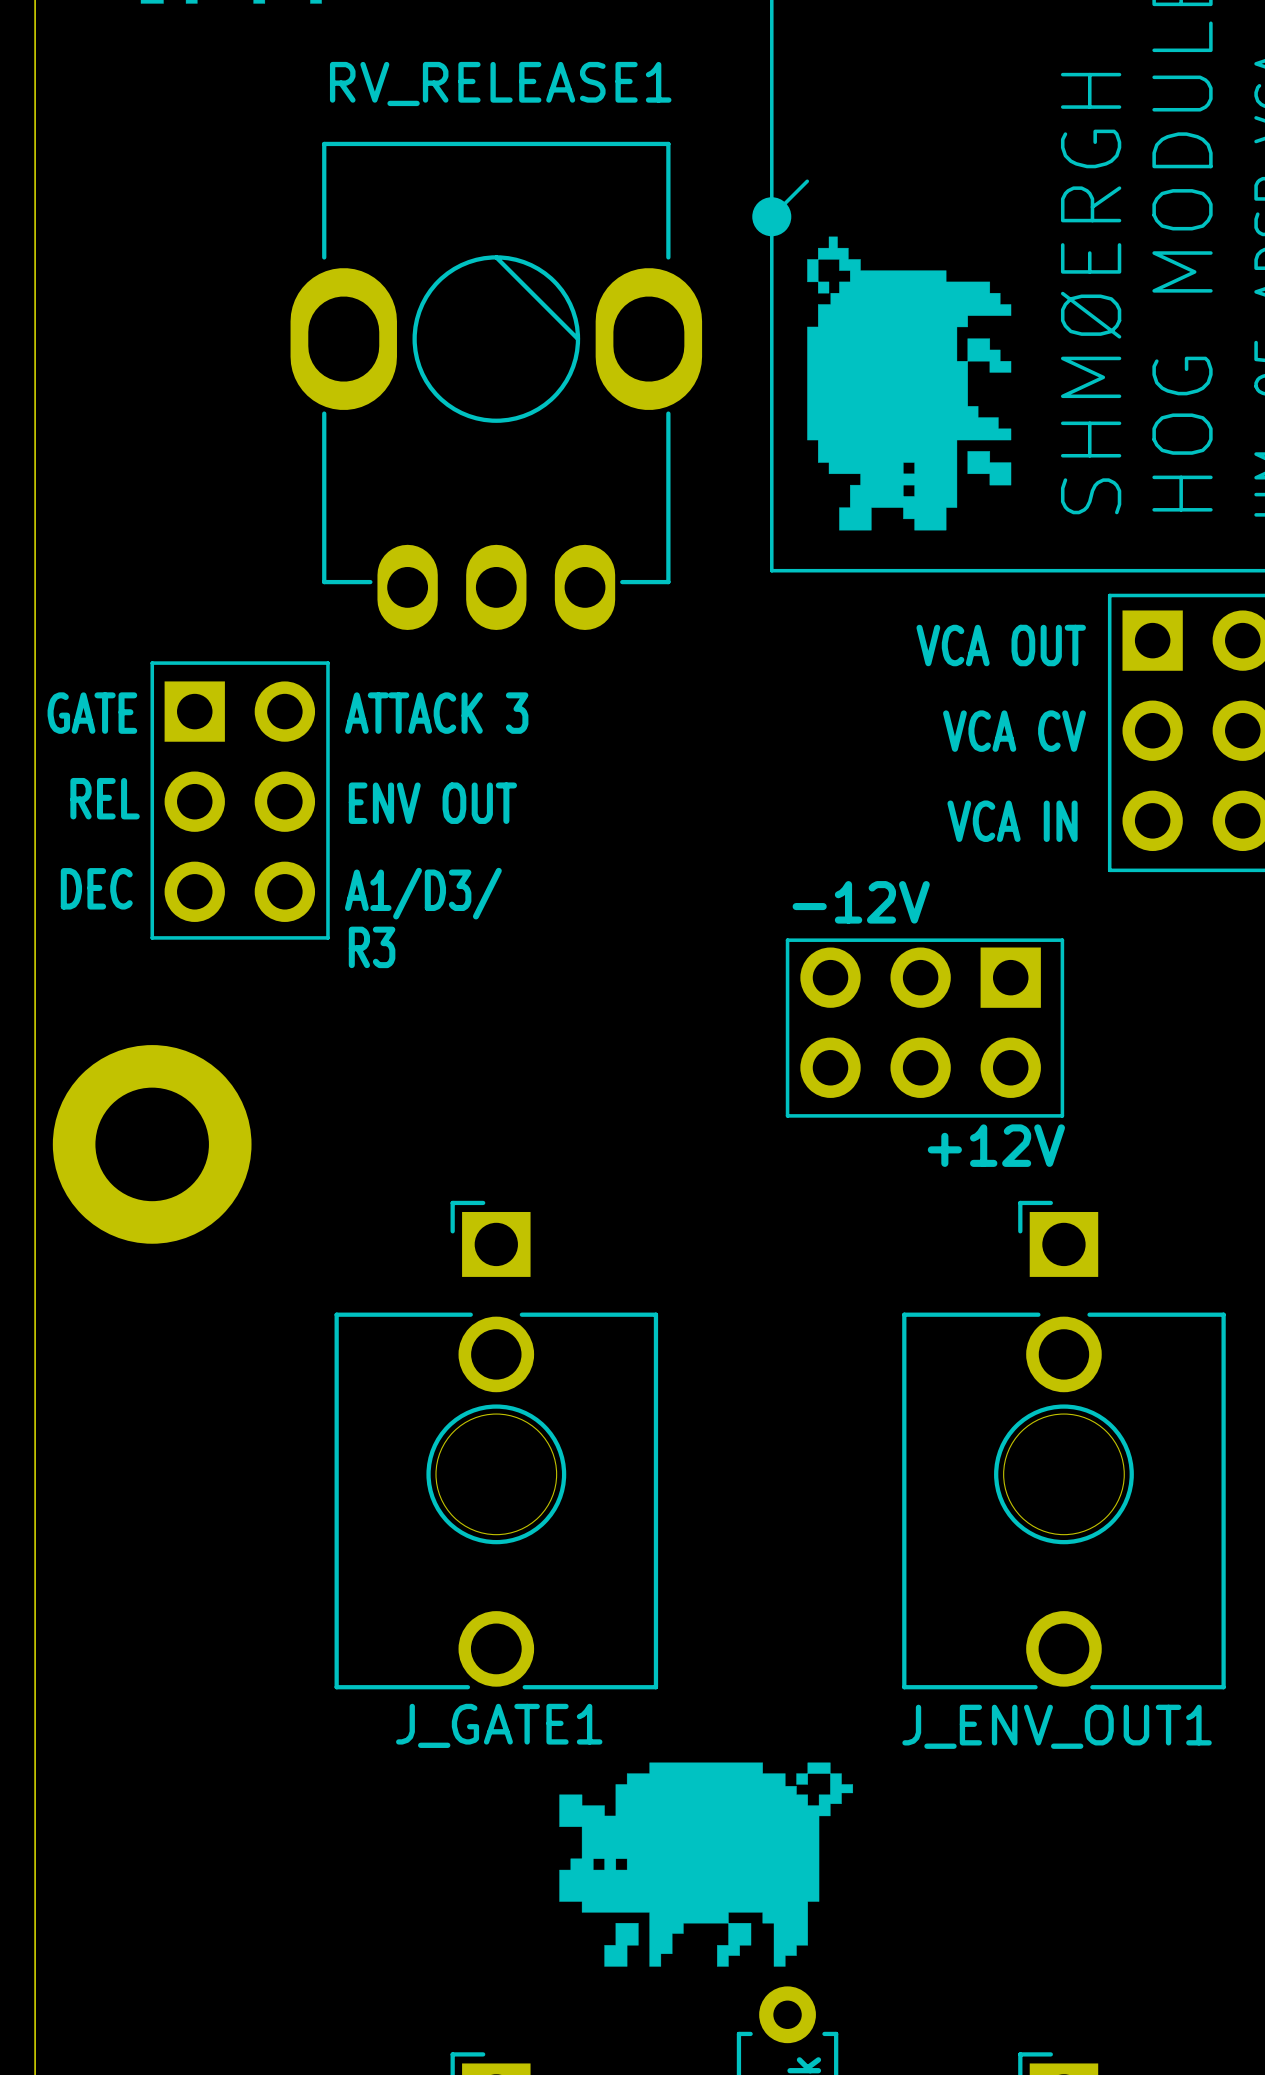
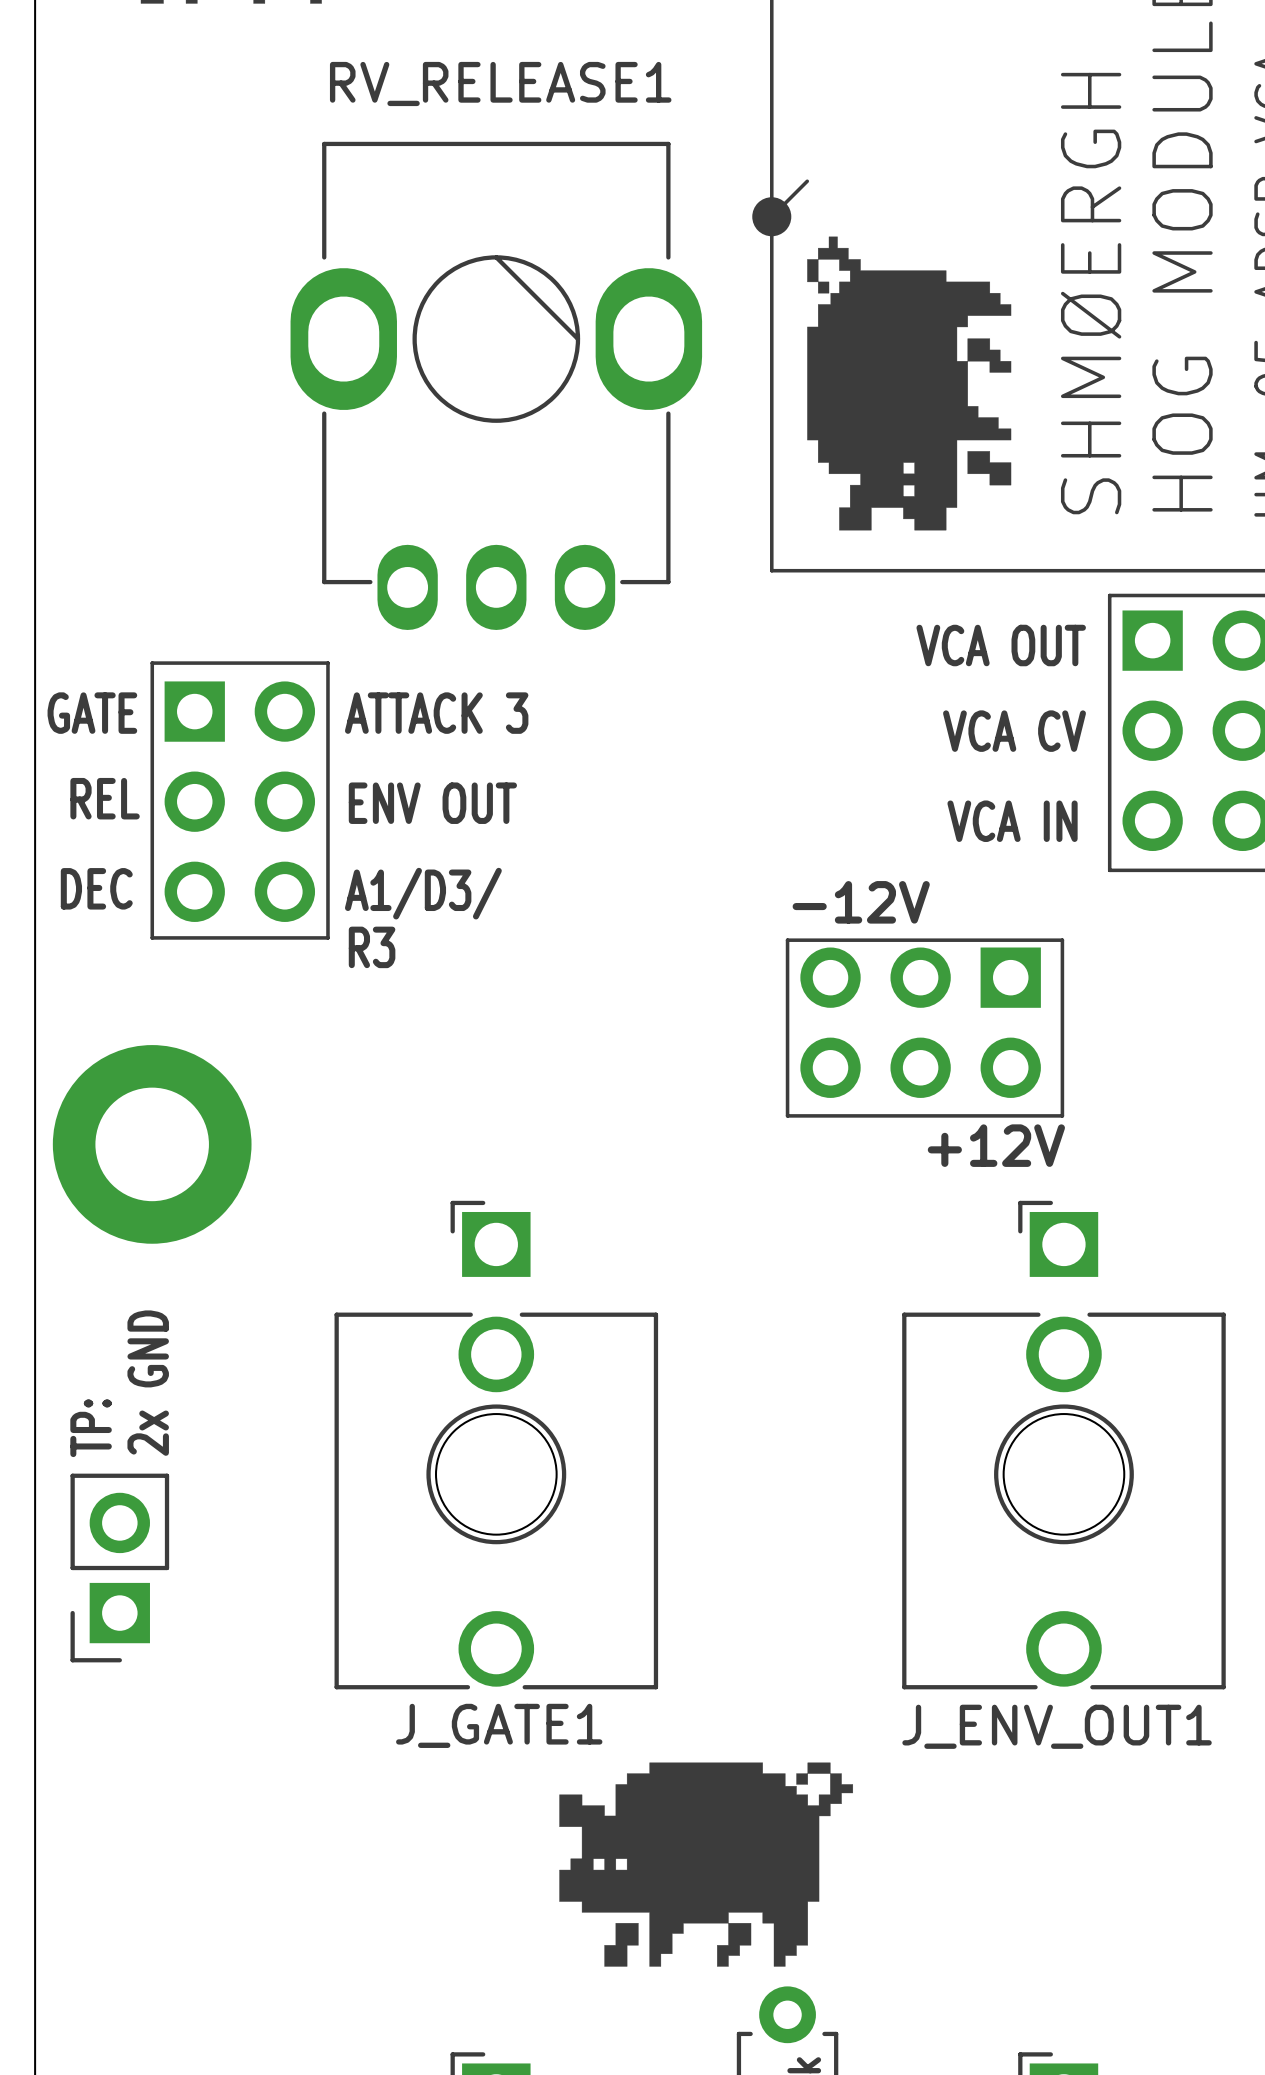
text: none -> 2x GND (148, 1383)
text: none -> TP: (91, 1428)
part: none -> (119, 1568)

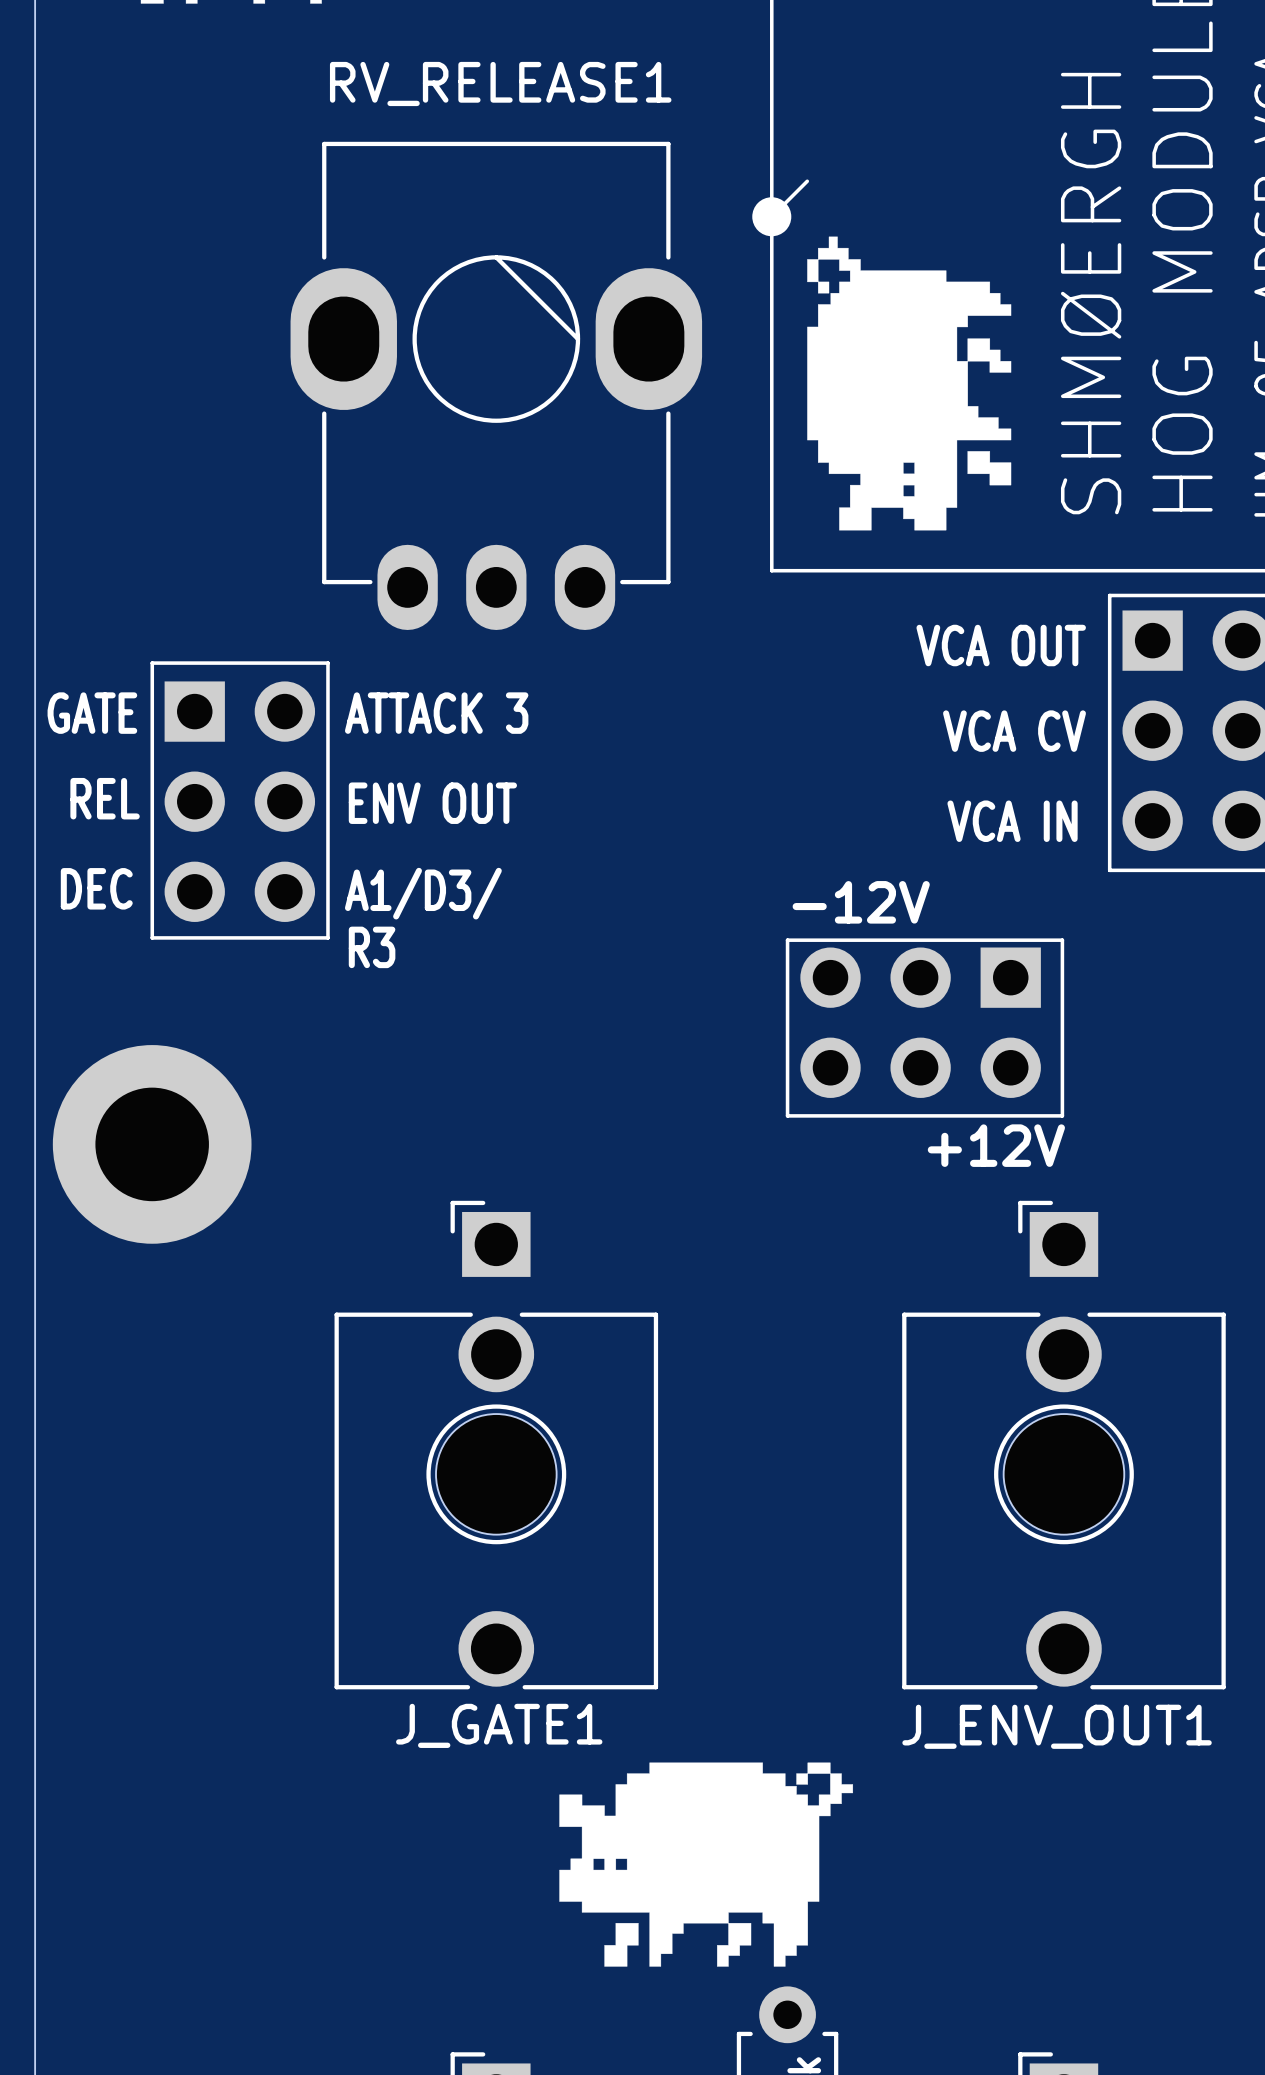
text: 2x GND (148, 1383) -> none
text: TP: (91, 1428) -> none
part: (119, 1568) -> none

